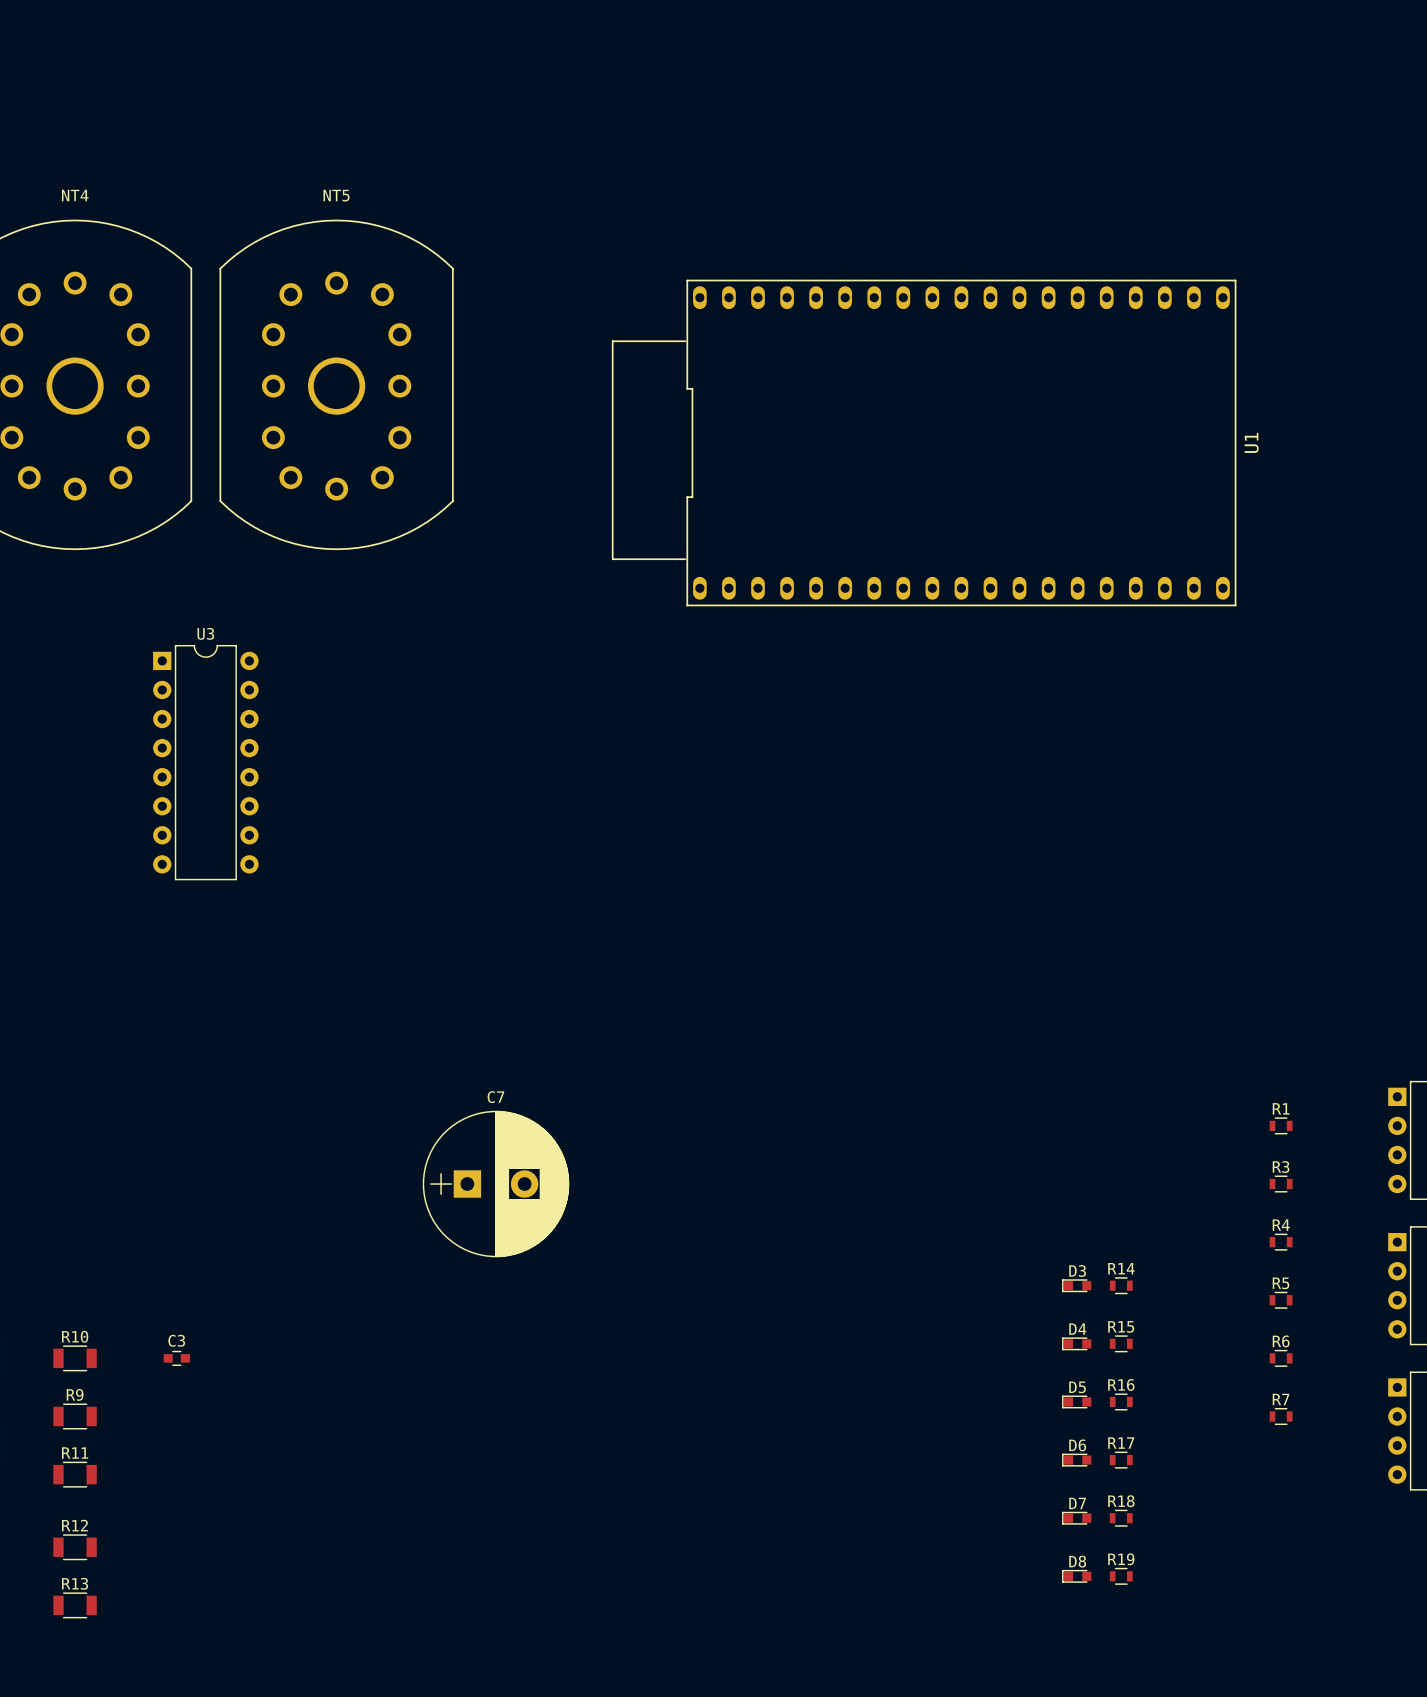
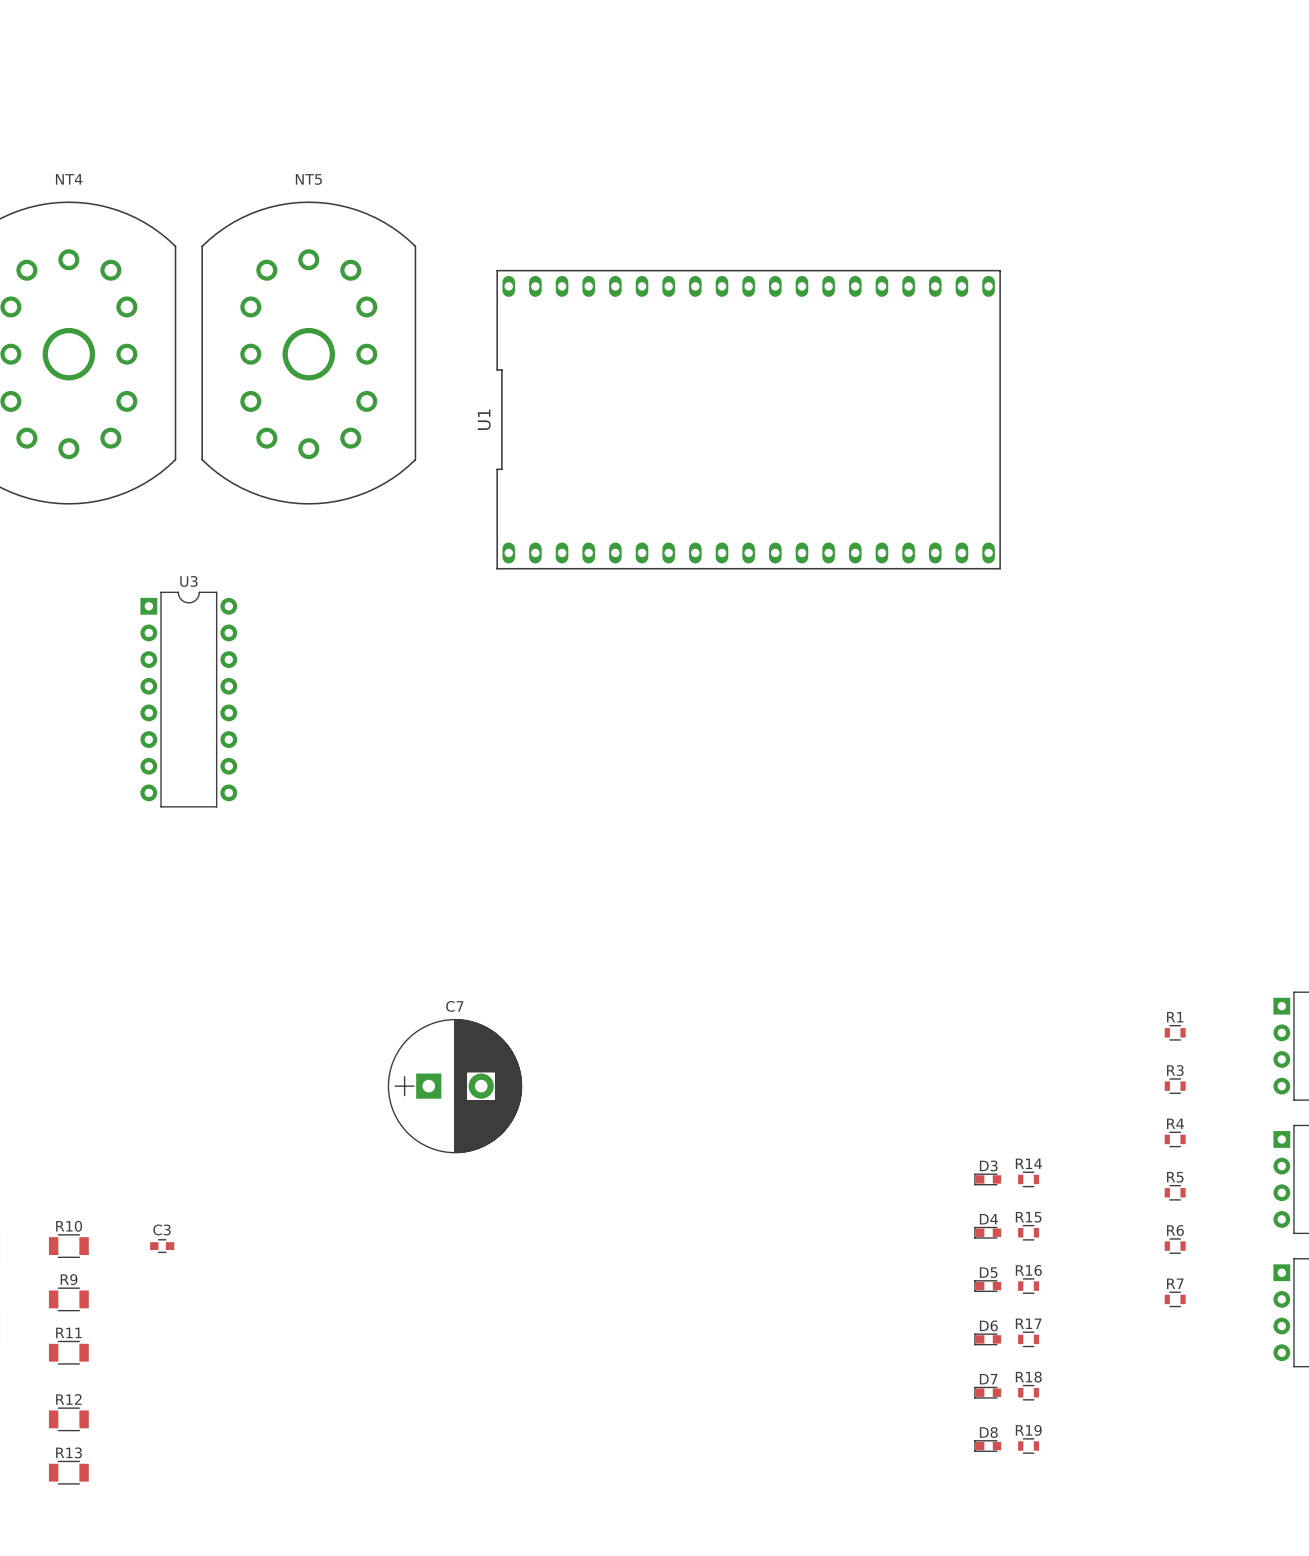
U1 footprint: [611, 279, 1237, 607] -> [496, 269, 1001, 570]
U1 name position: U1 (1251, 442) -> U1 (484, 419)

